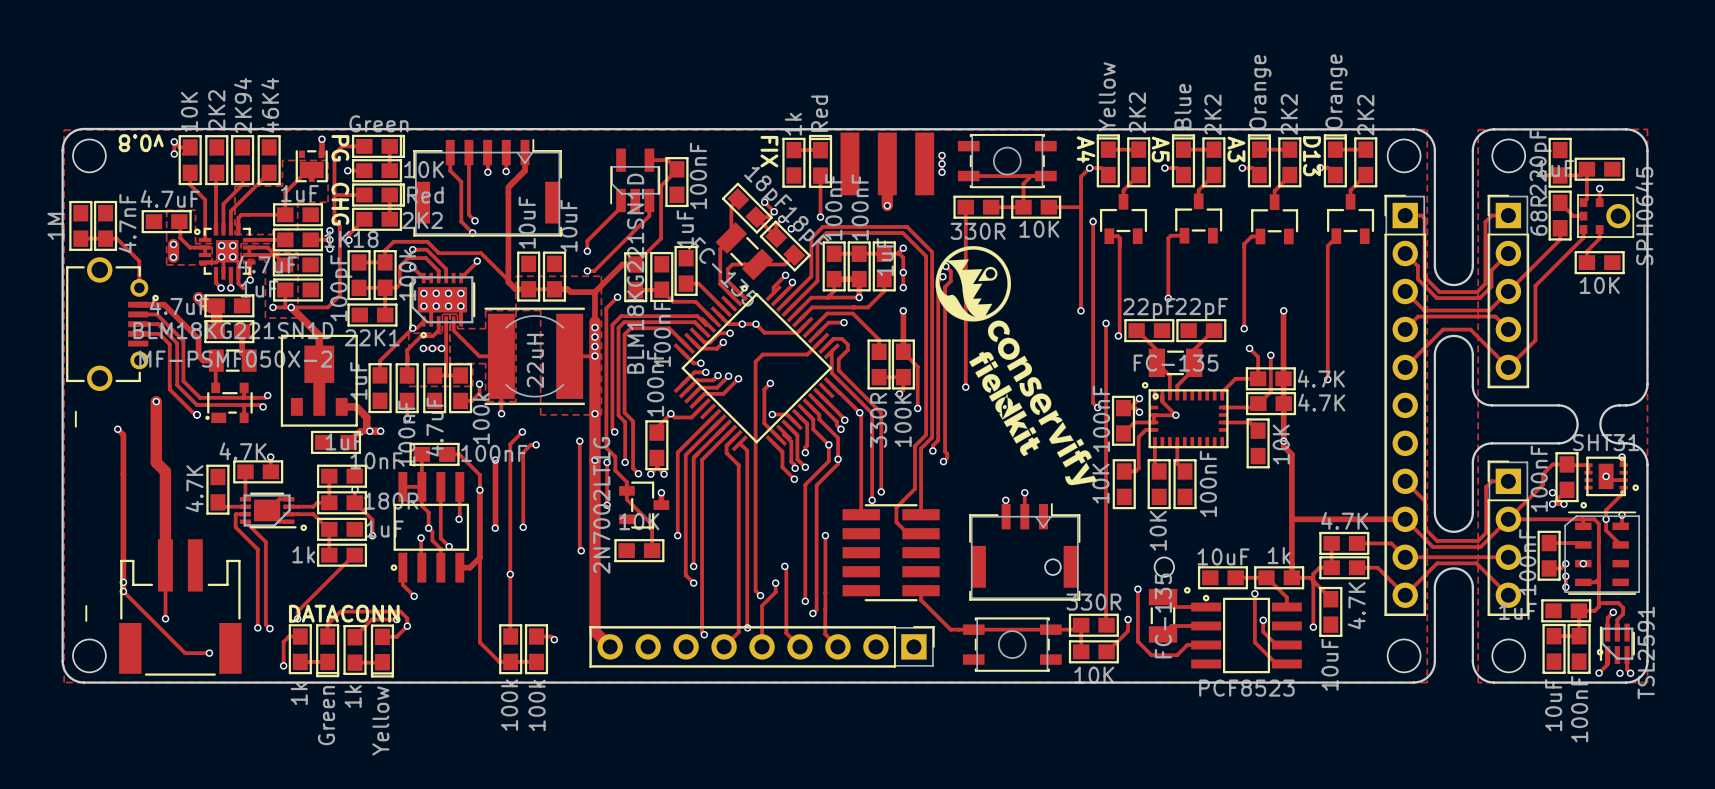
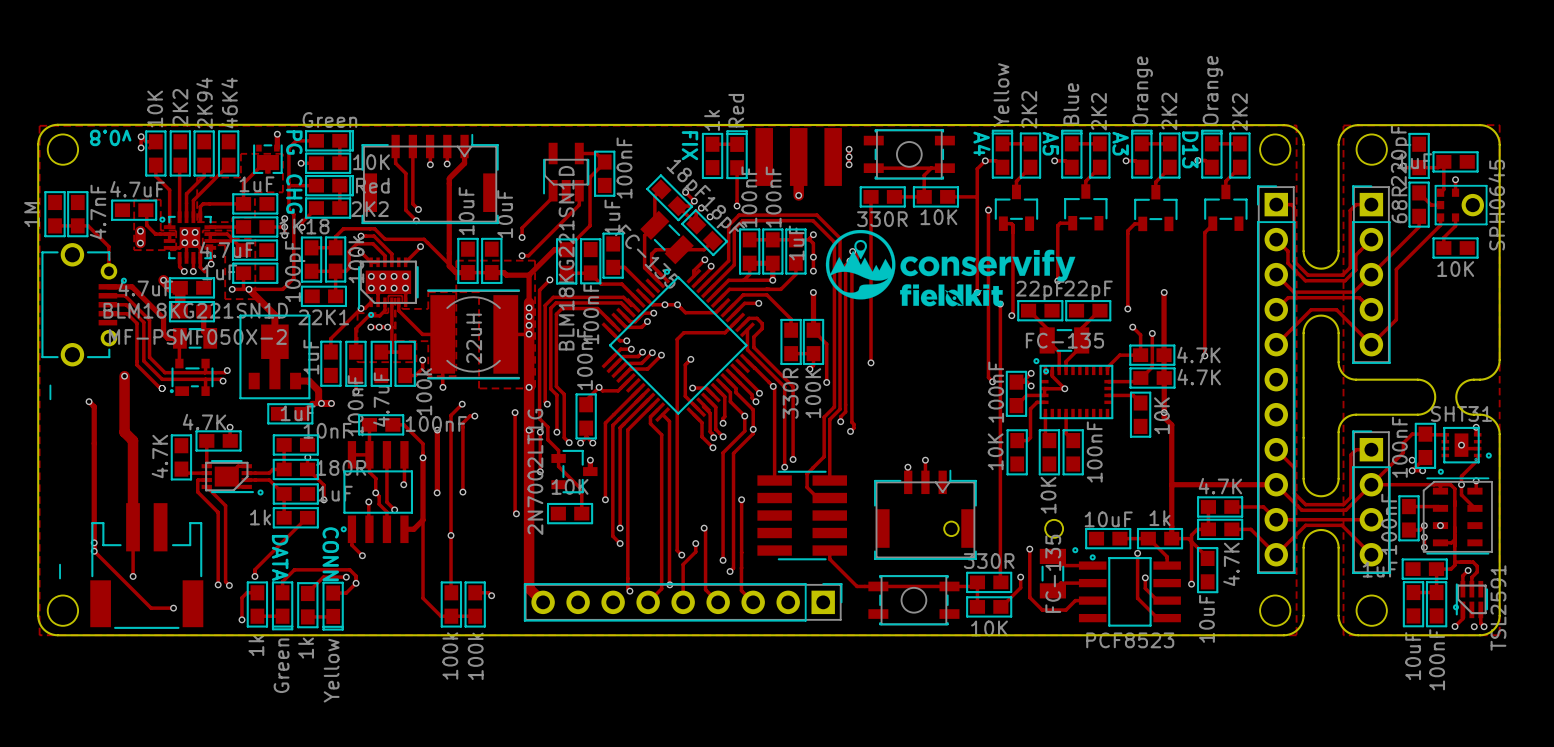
drawing: none -> [825, 229, 1076, 307]
drawing: [935, 246, 1098, 486] -> none
text rotation: 0° (313, 613) -> 90° clockwise (280, 558)
text rotation: 0° (370, 613) -> 90° clockwise (330, 554)

